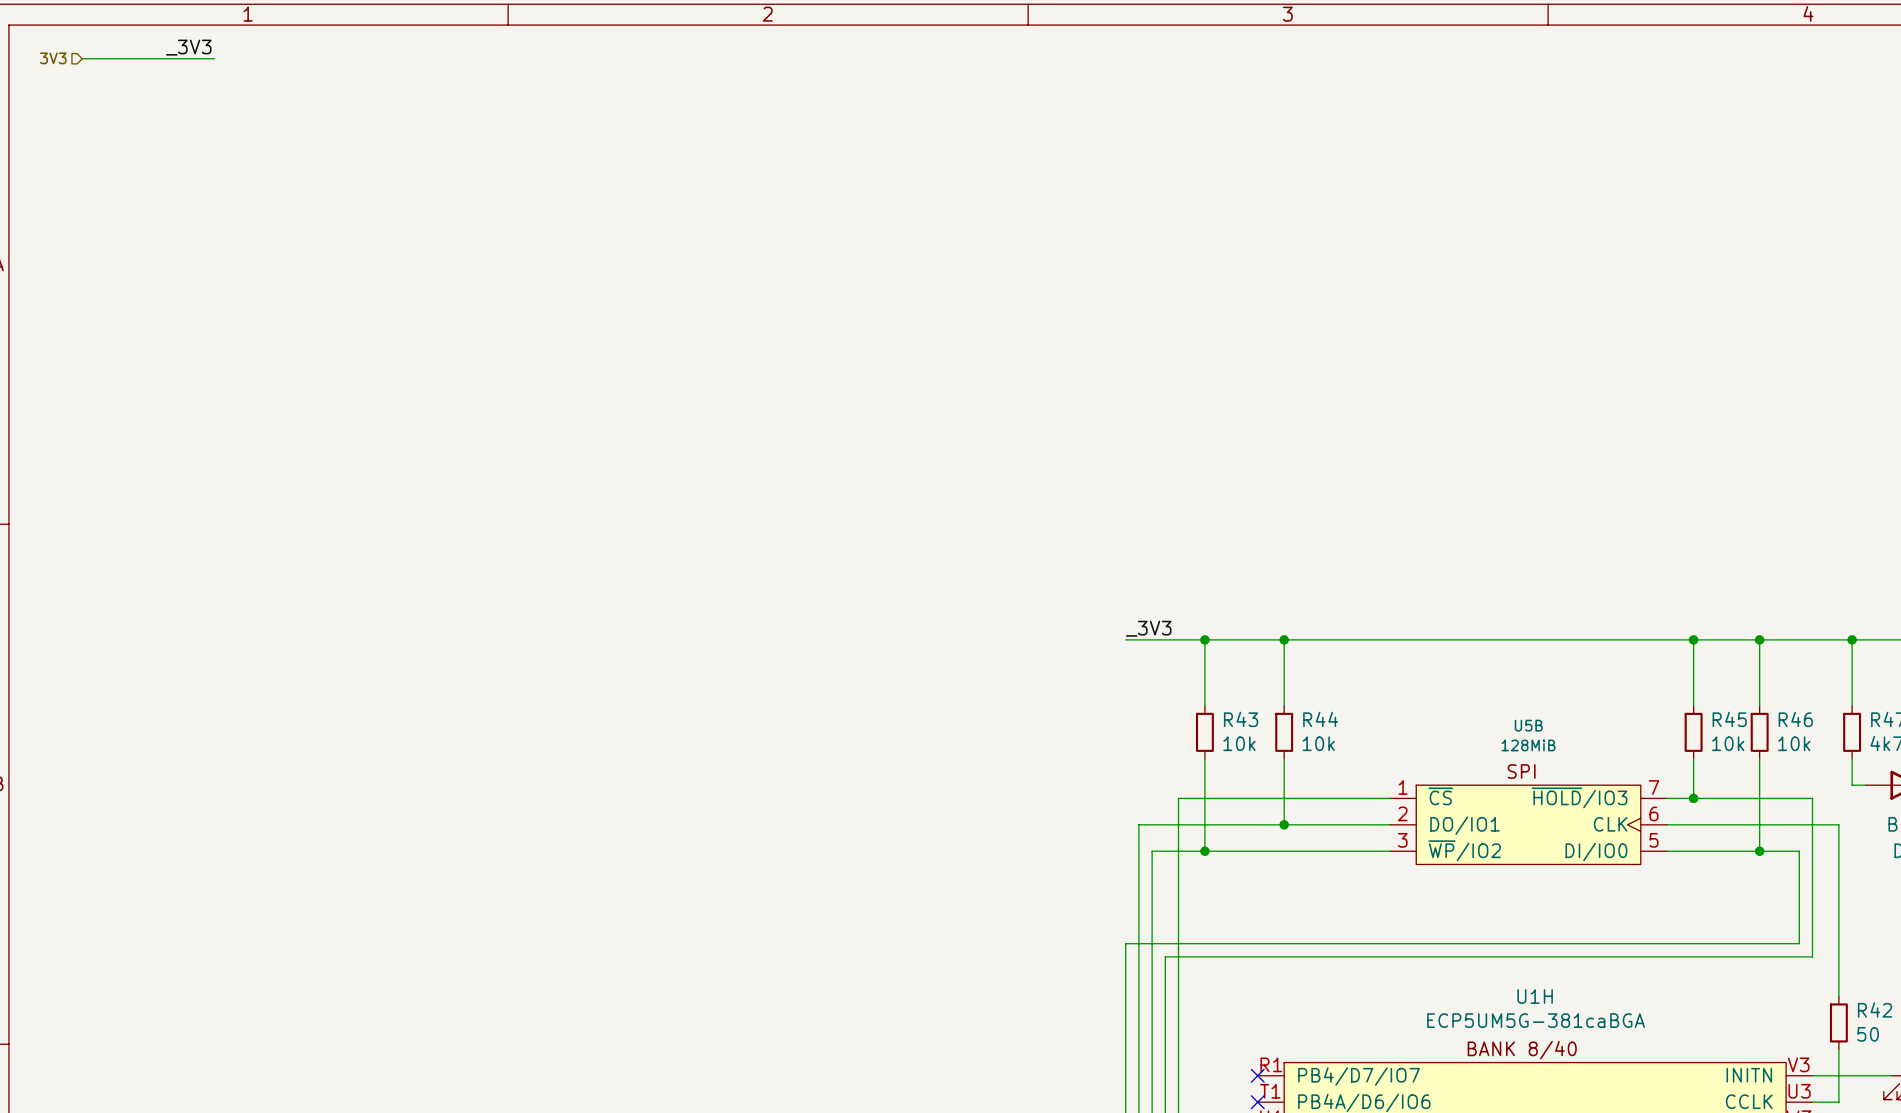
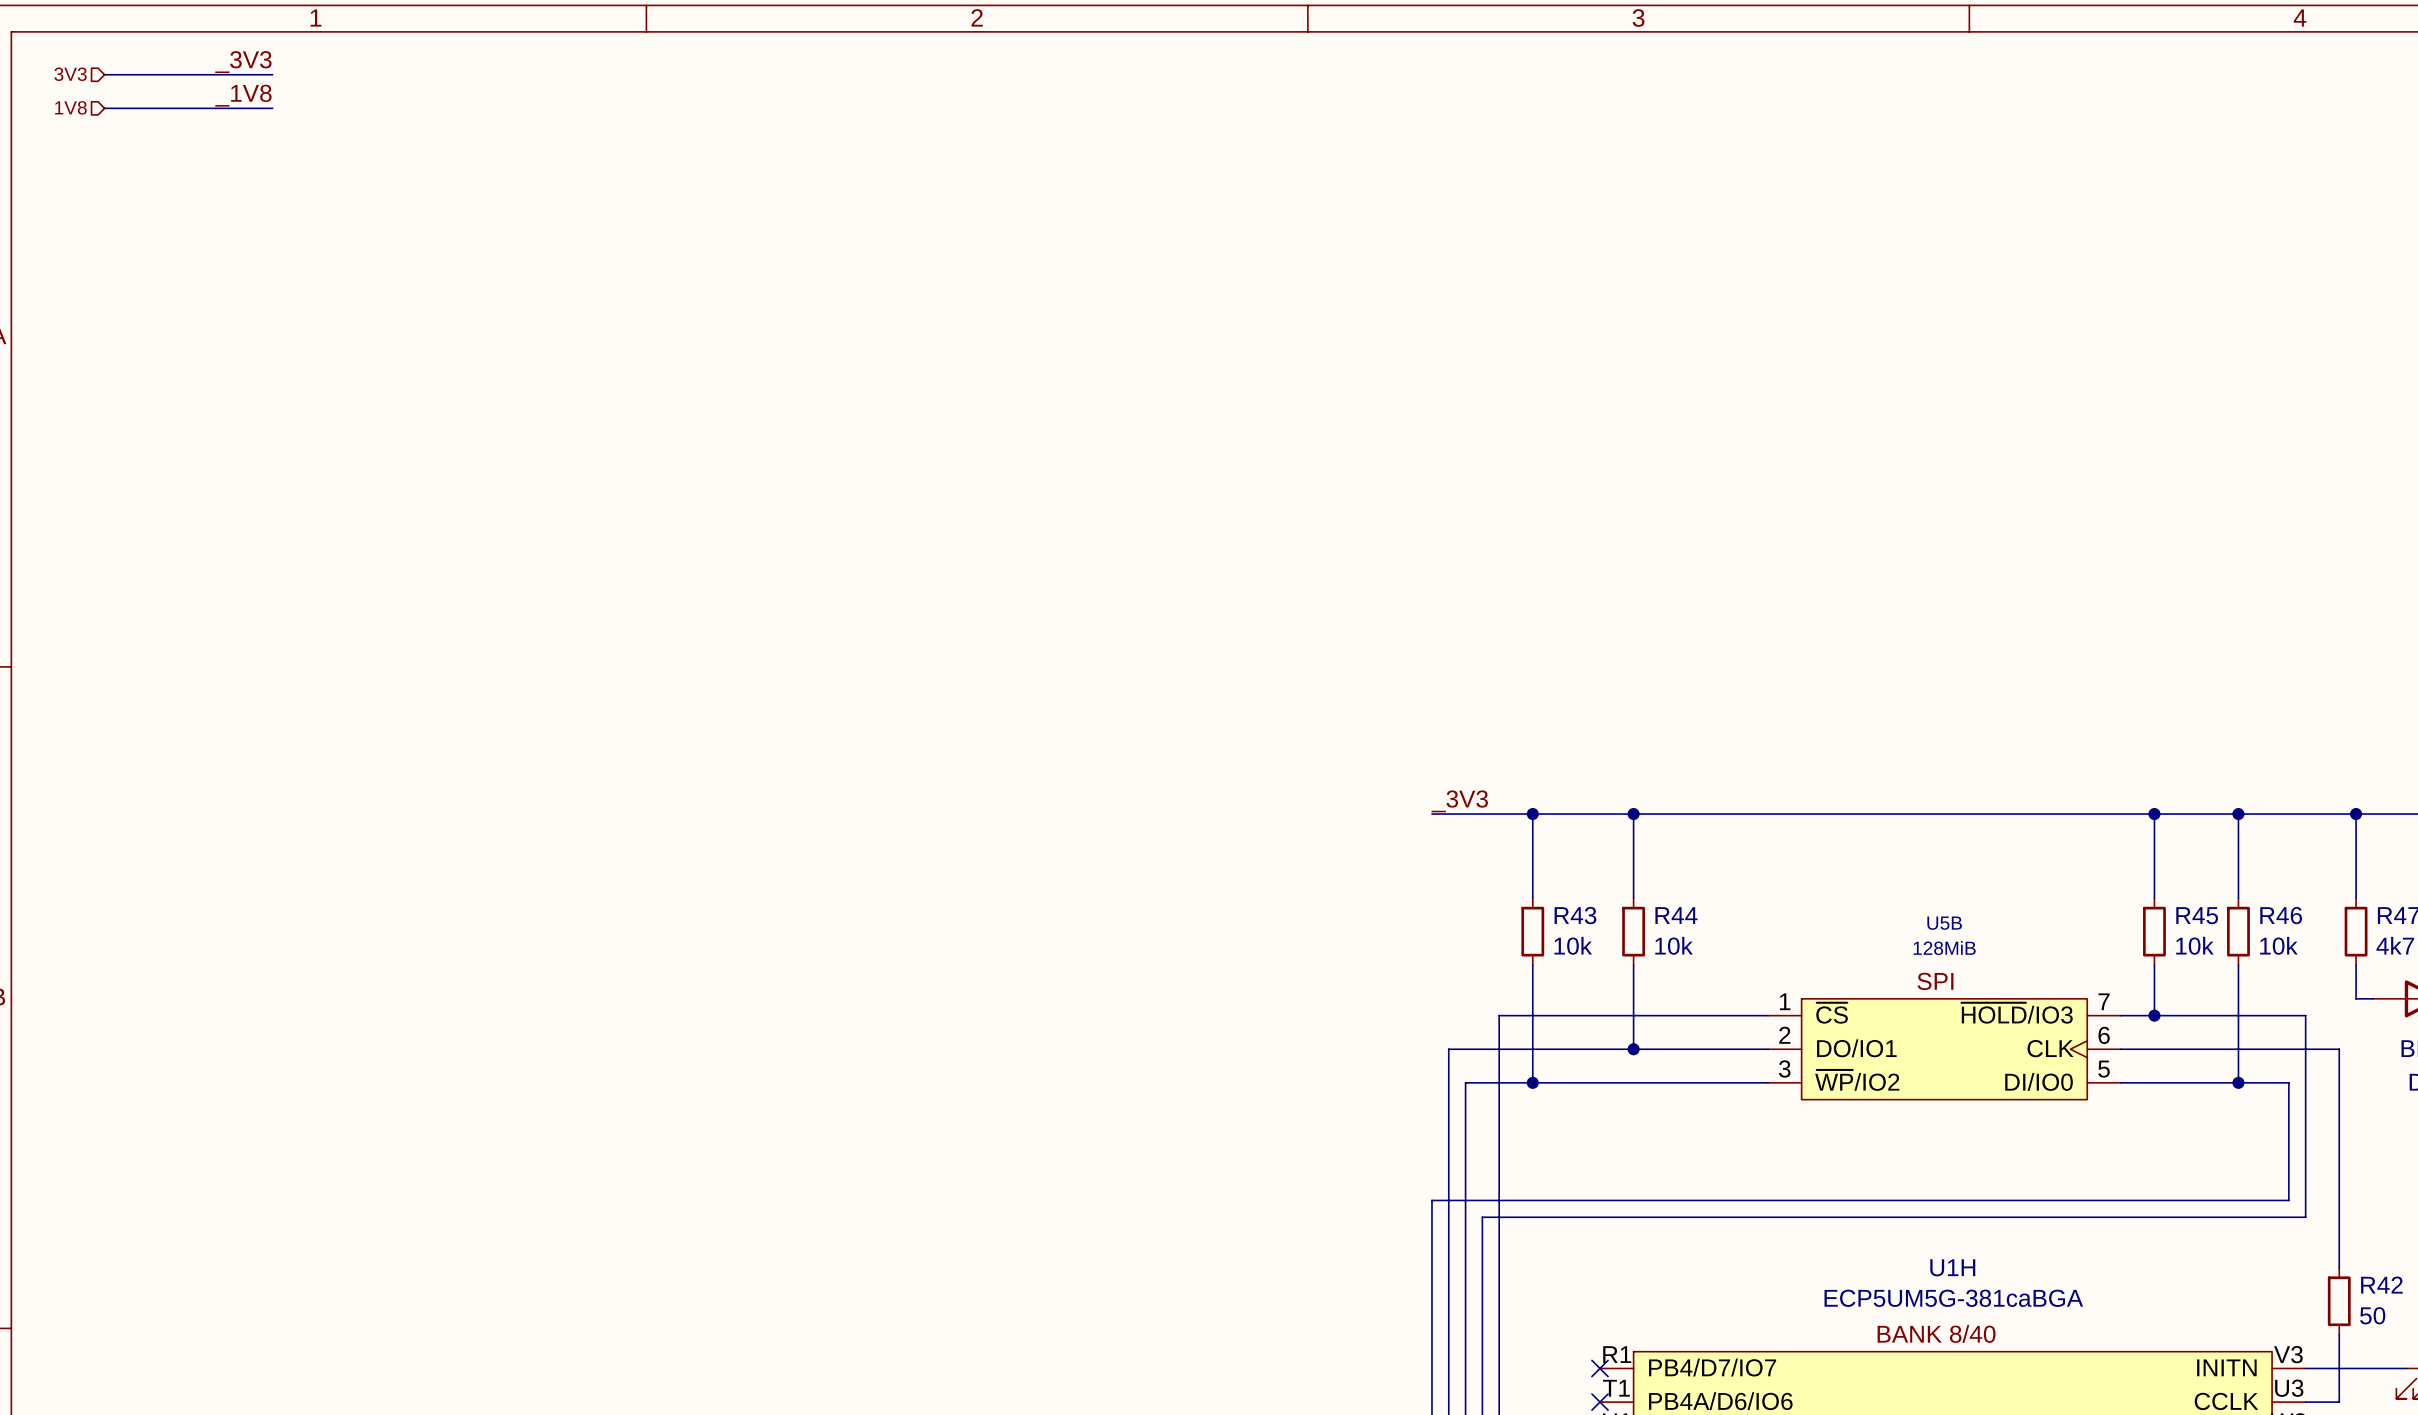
label: none -> _1V8 (243, 95)
hierarchical label: none -> 1V8 (70, 107)
wire: none -> (104, 108) (272, 108)

